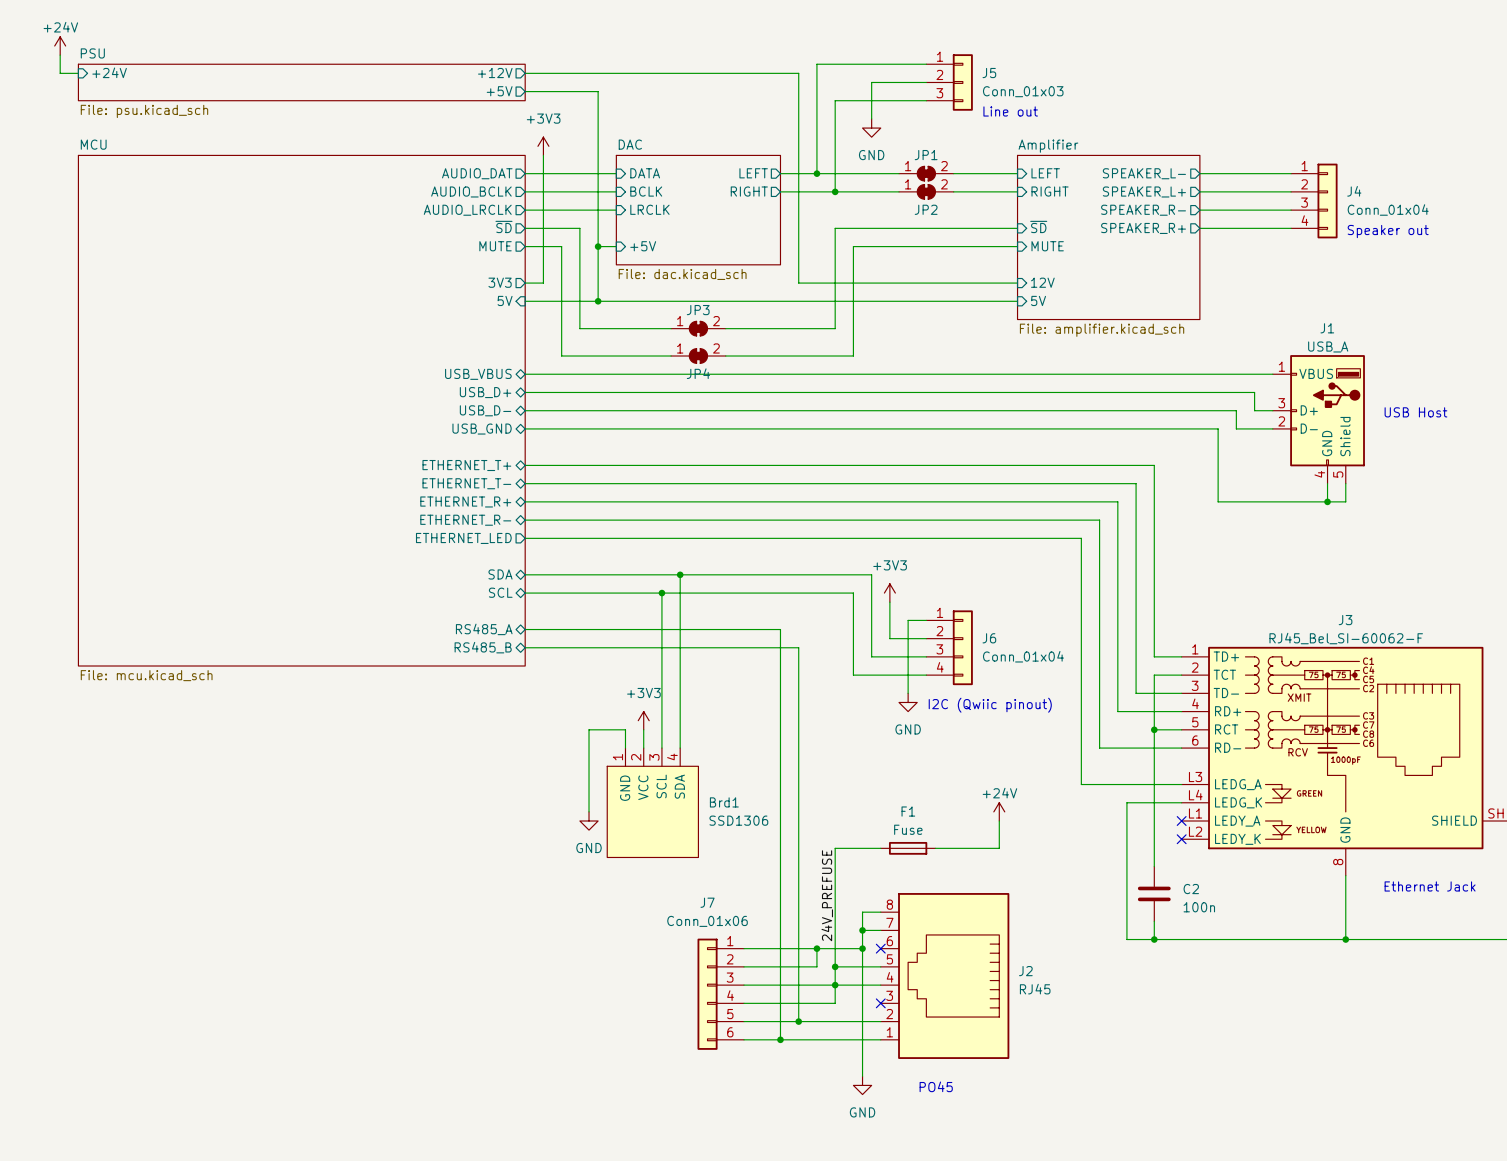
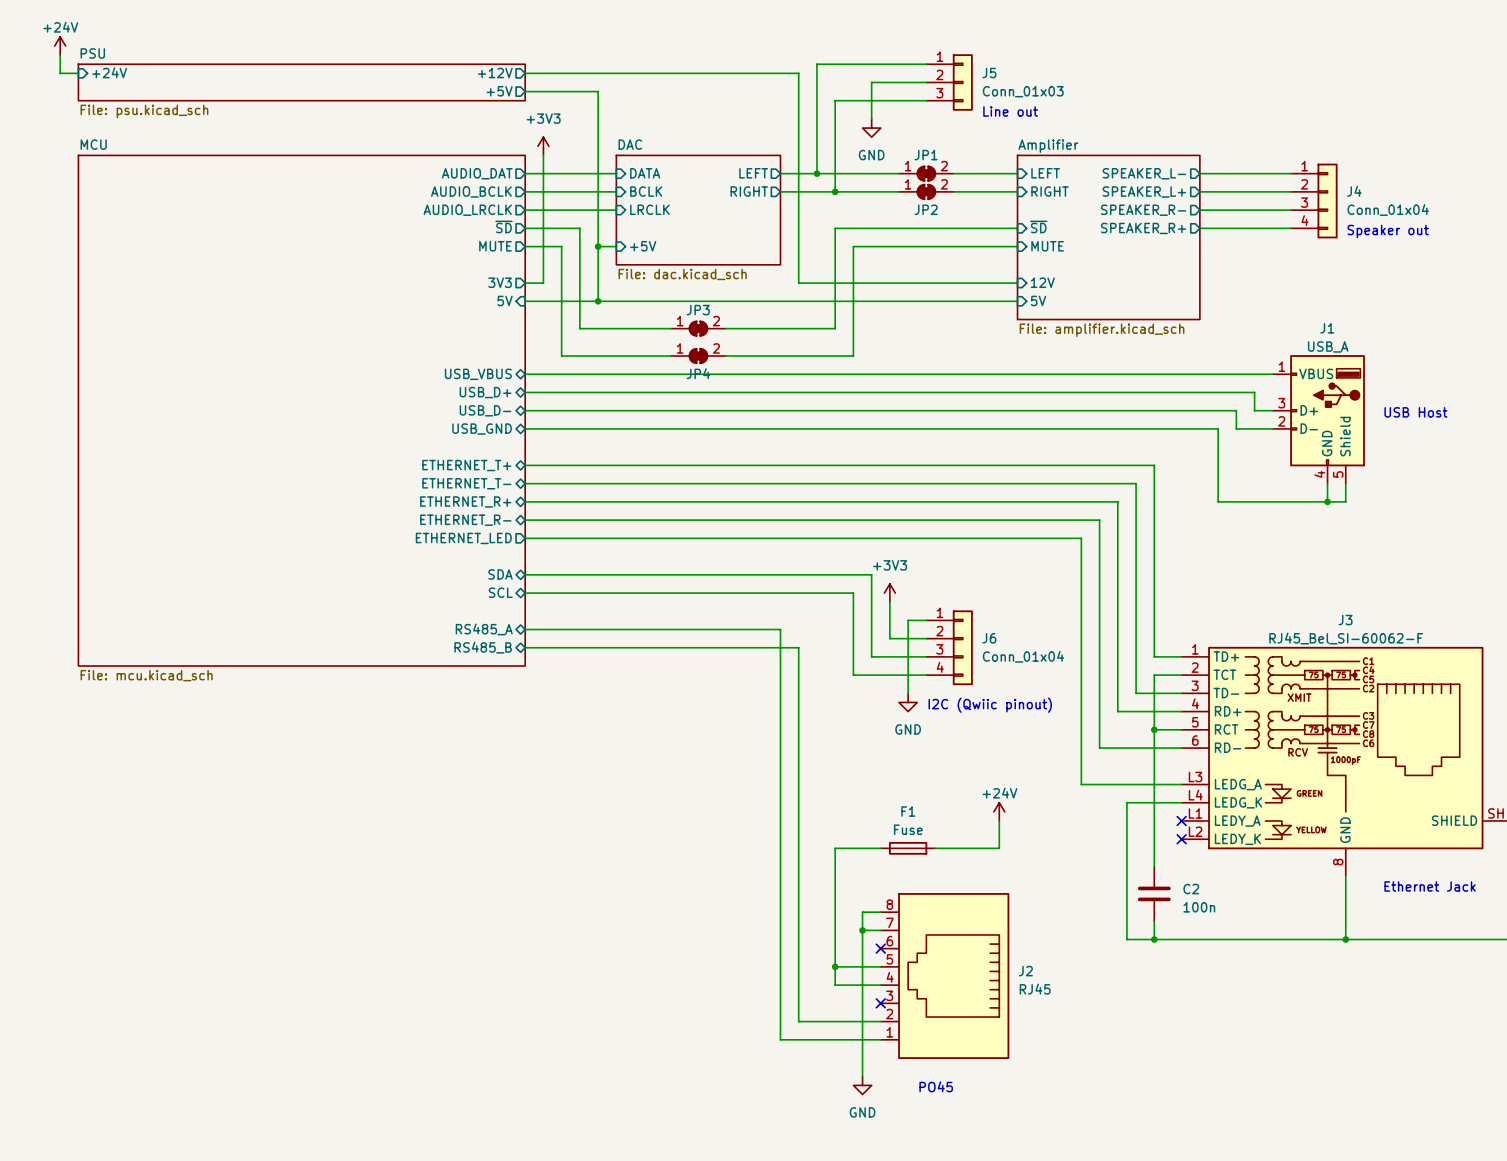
wire: (680, 574) (680, 748) -> none
junction: (680, 574) -> none
wire: (661, 593) (661, 748) -> none
junction: (661, 593) -> none
power symbol: +3V3 (643, 720) -> none
wire: (643, 729) (643, 748) -> none
wire: (625, 748) (625, 729) (589, 729) (589, 811) -> none
Brd1: SSD1306 (652, 802) -> none
power symbol: GND (589, 821) -> none
label: 24V_PREFUSE (827, 895) -> none
wire: (744, 948) (862, 948) -> none
wire: (816, 948) (816, 966) (744, 966) -> none
junction: (816, 948) -> none
junction: (862, 948) -> none
wire: (744, 985) (835, 985) (835, 1003) (744, 1003) -> none
junction: (835, 985) -> none
J7: Conn_01x06 (720, 994) -> none
wire: (744, 1021) (798, 1021) -> none
junction: (798, 1021) -> none
wire: (744, 1039) (780, 1039) -> none
junction: (780, 1039) -> none

